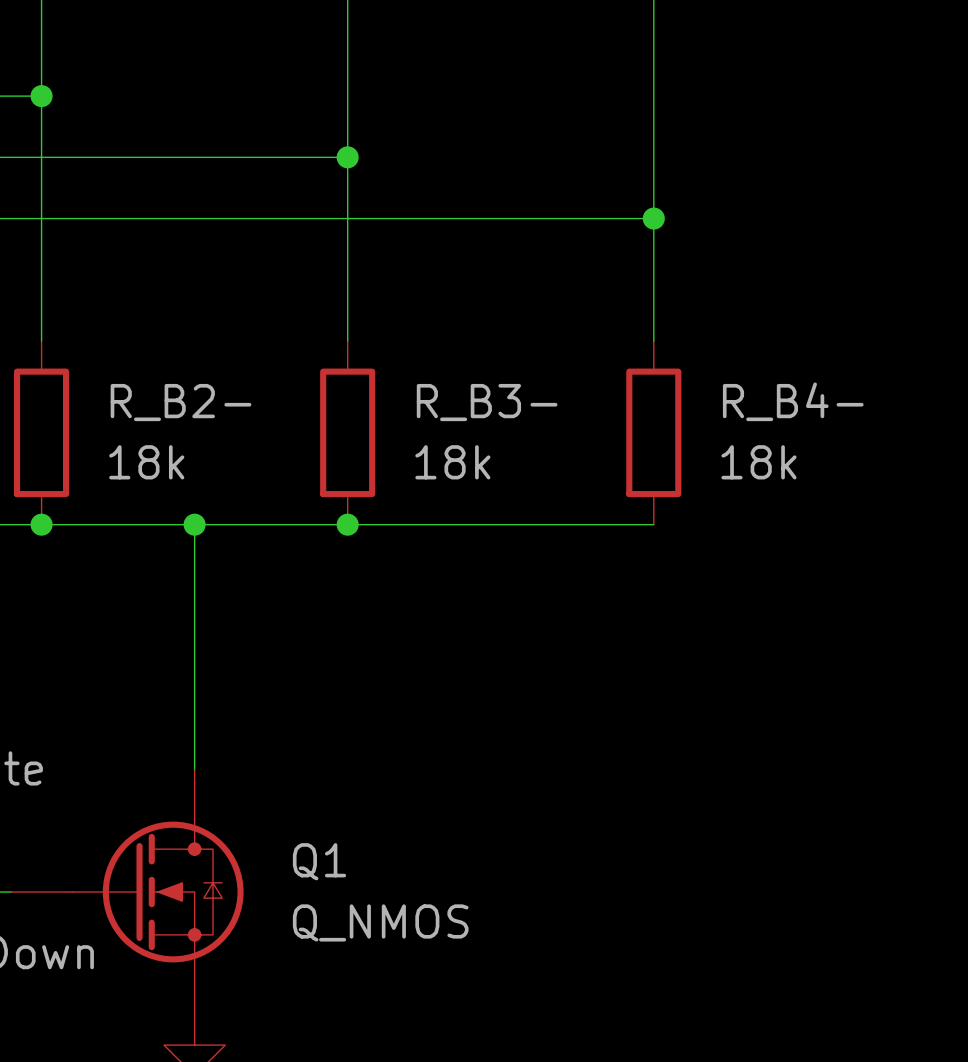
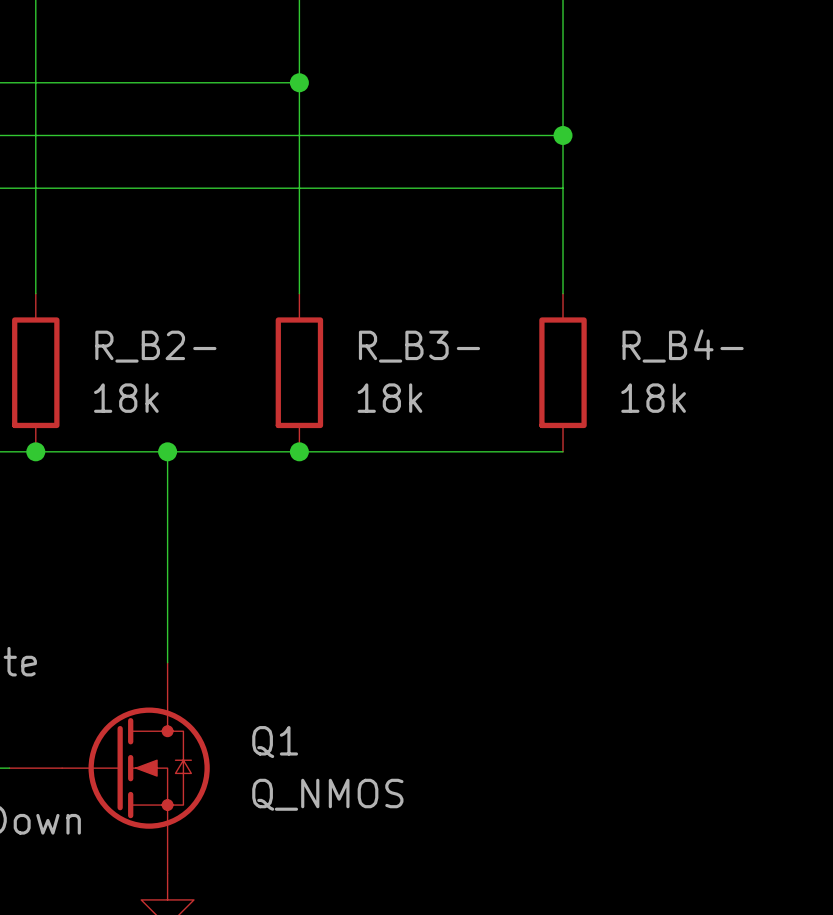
wire: none -> (35, 82) (299, 82)
junction: (41, 96) -> none
wire: none -> (299, 135) (563, 135)
junction position: (347, 157) -> (299, 82)
junction position: (653, 218) -> (563, 135)

